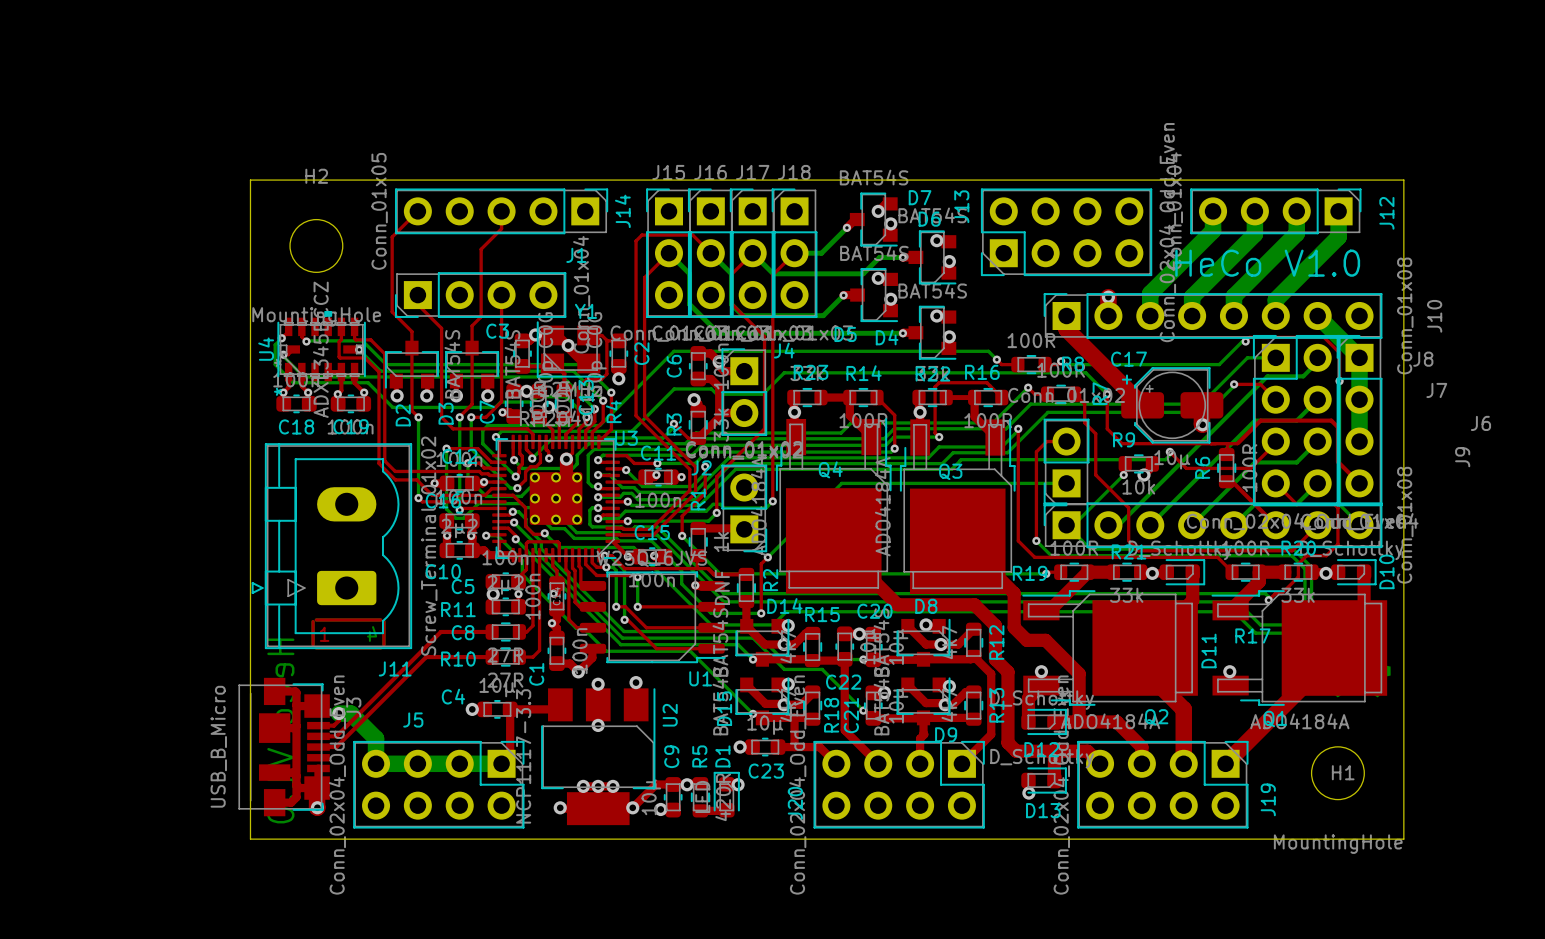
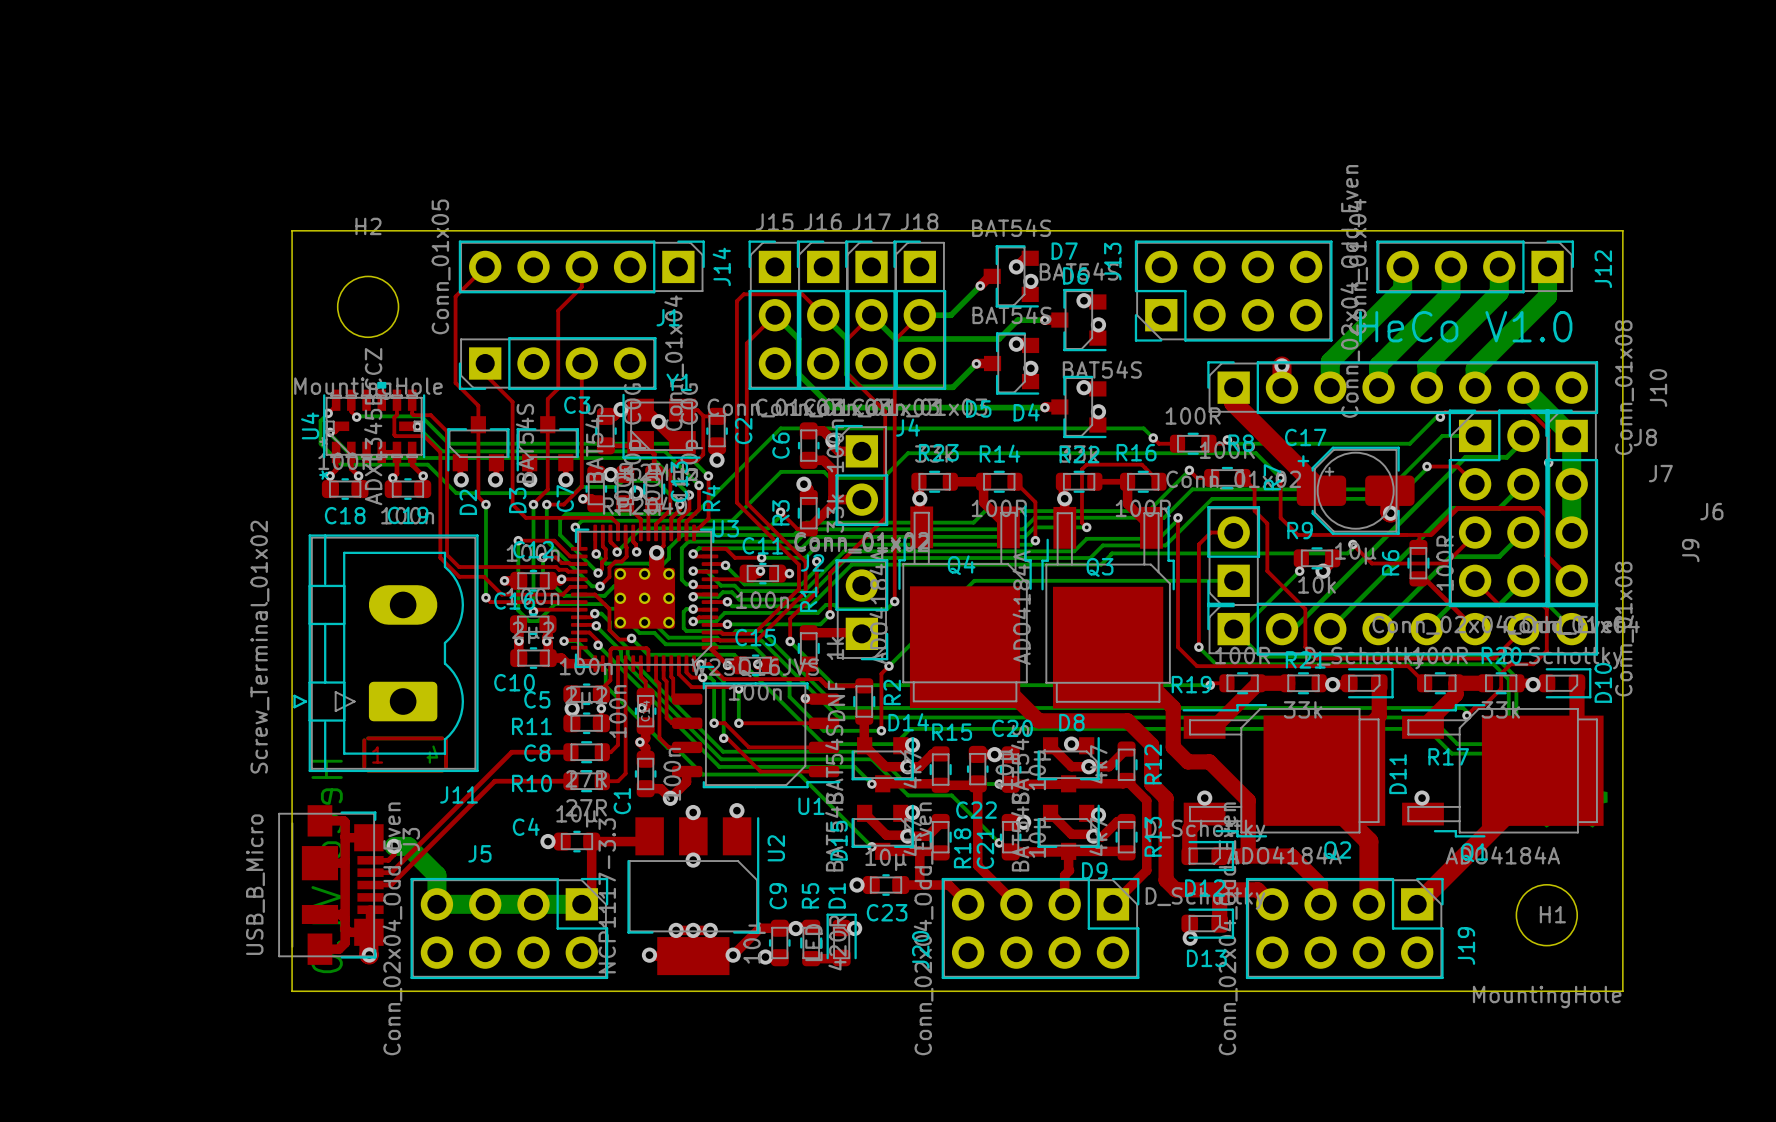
D4 value position: BAT54S (932, 290) -> BAT54S (1102, 369)
J11 value position: Screw_Terminal_01x02 (429, 546) -> Screw_Terminal_01x02 (259, 647)

